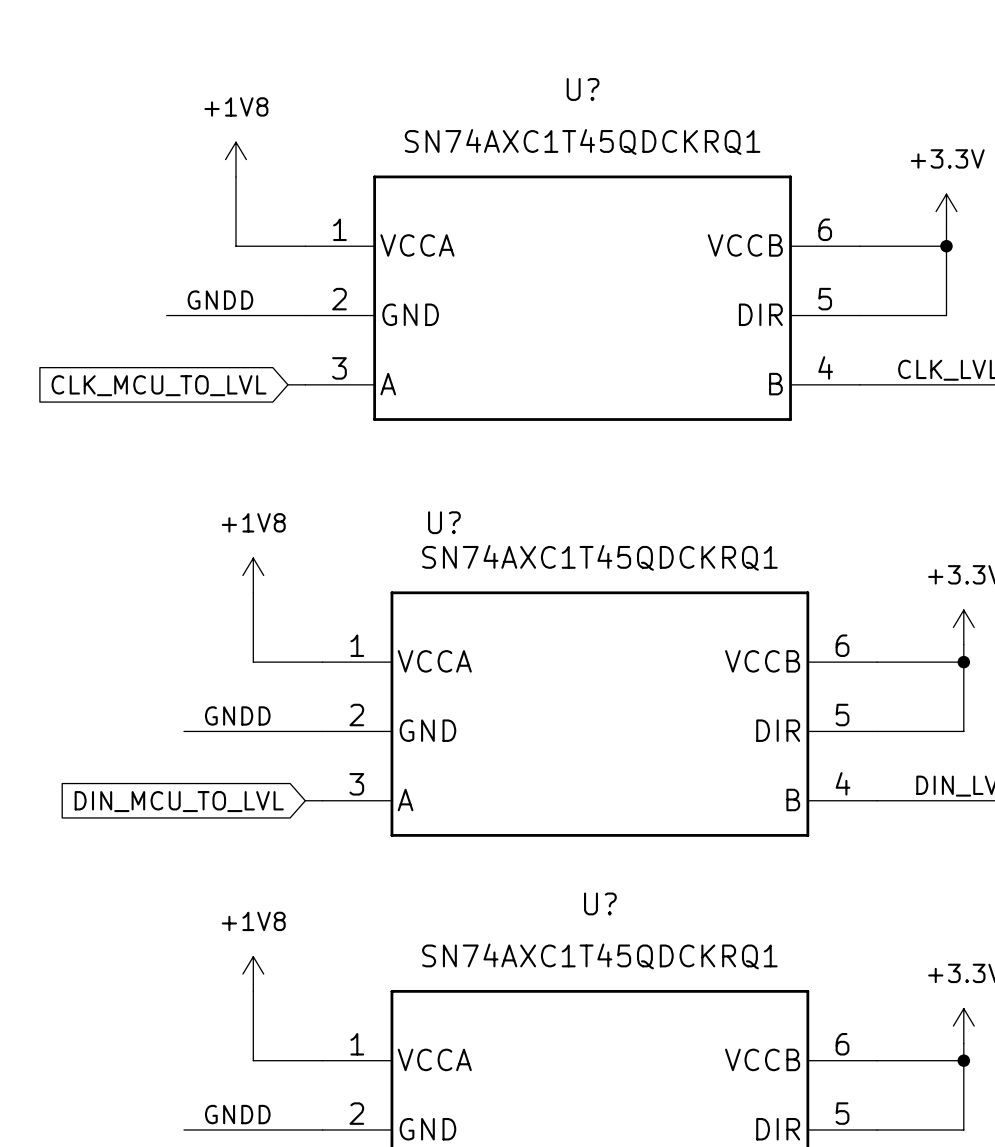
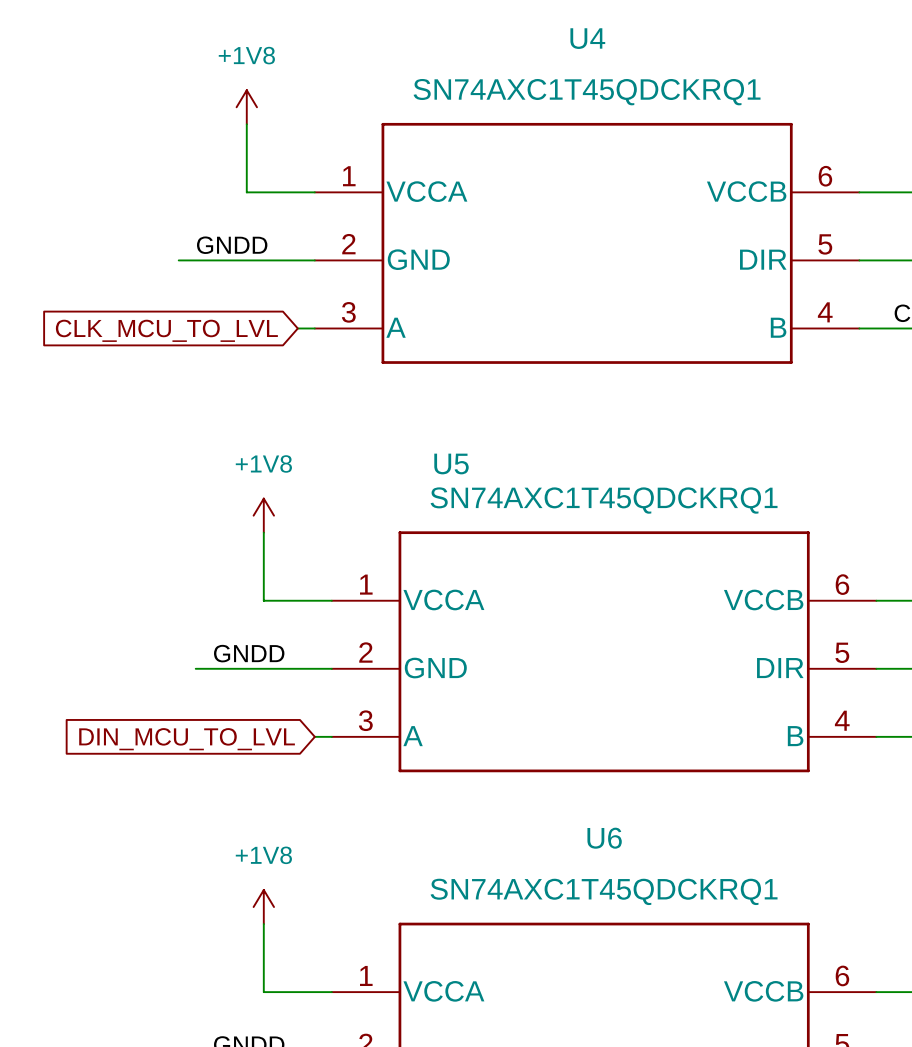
U? name: U? (583, 89) -> U4 (587, 38)
U? name: U? (444, 522) -> U5 (451, 463)
U? name: U? (600, 903) -> U6 (604, 838)

